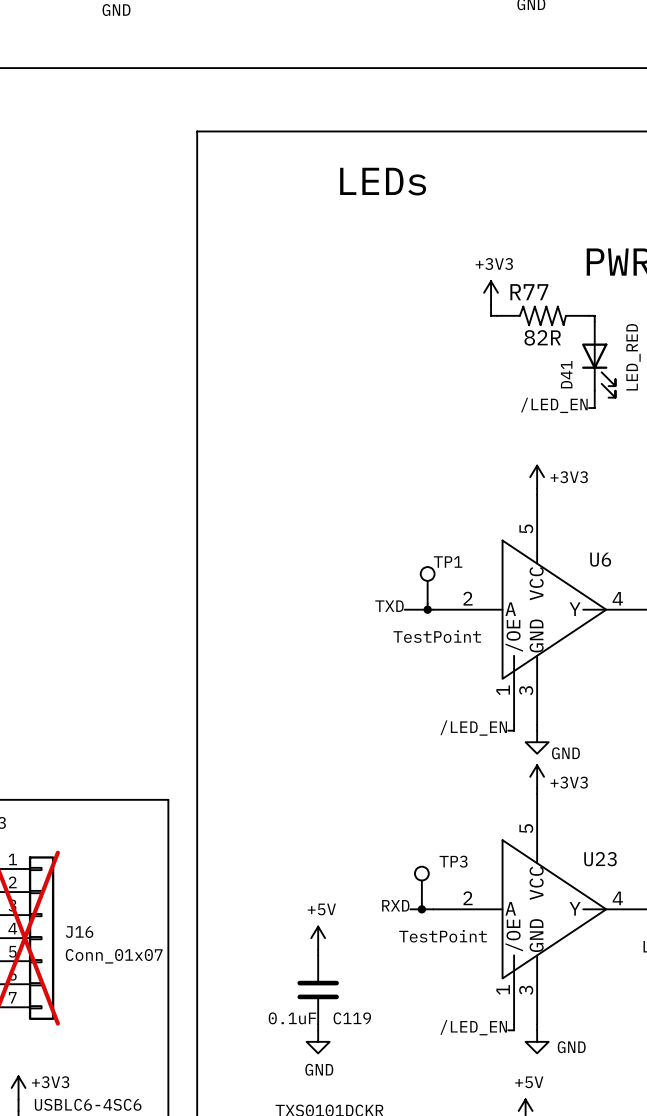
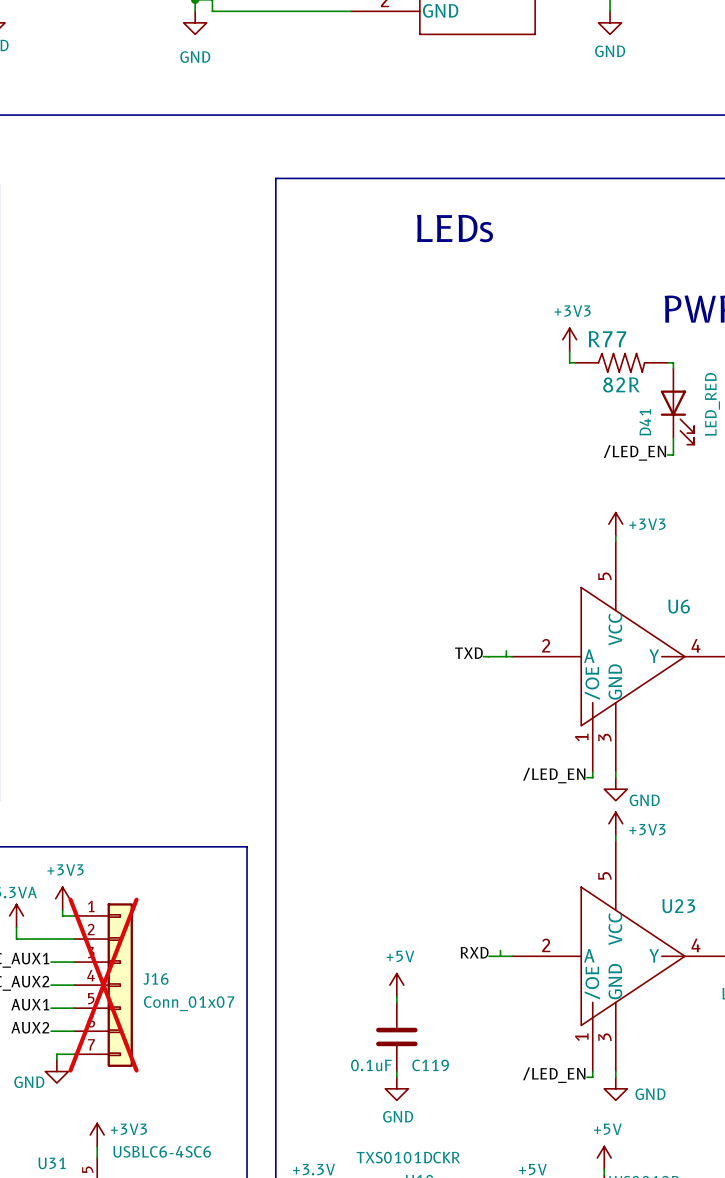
TP1: TestPoint (427, 585) -> none
junction: (427, 609) -> none
TP3: TestPoint (421, 885) -> none
junction: (421, 909) -> none

